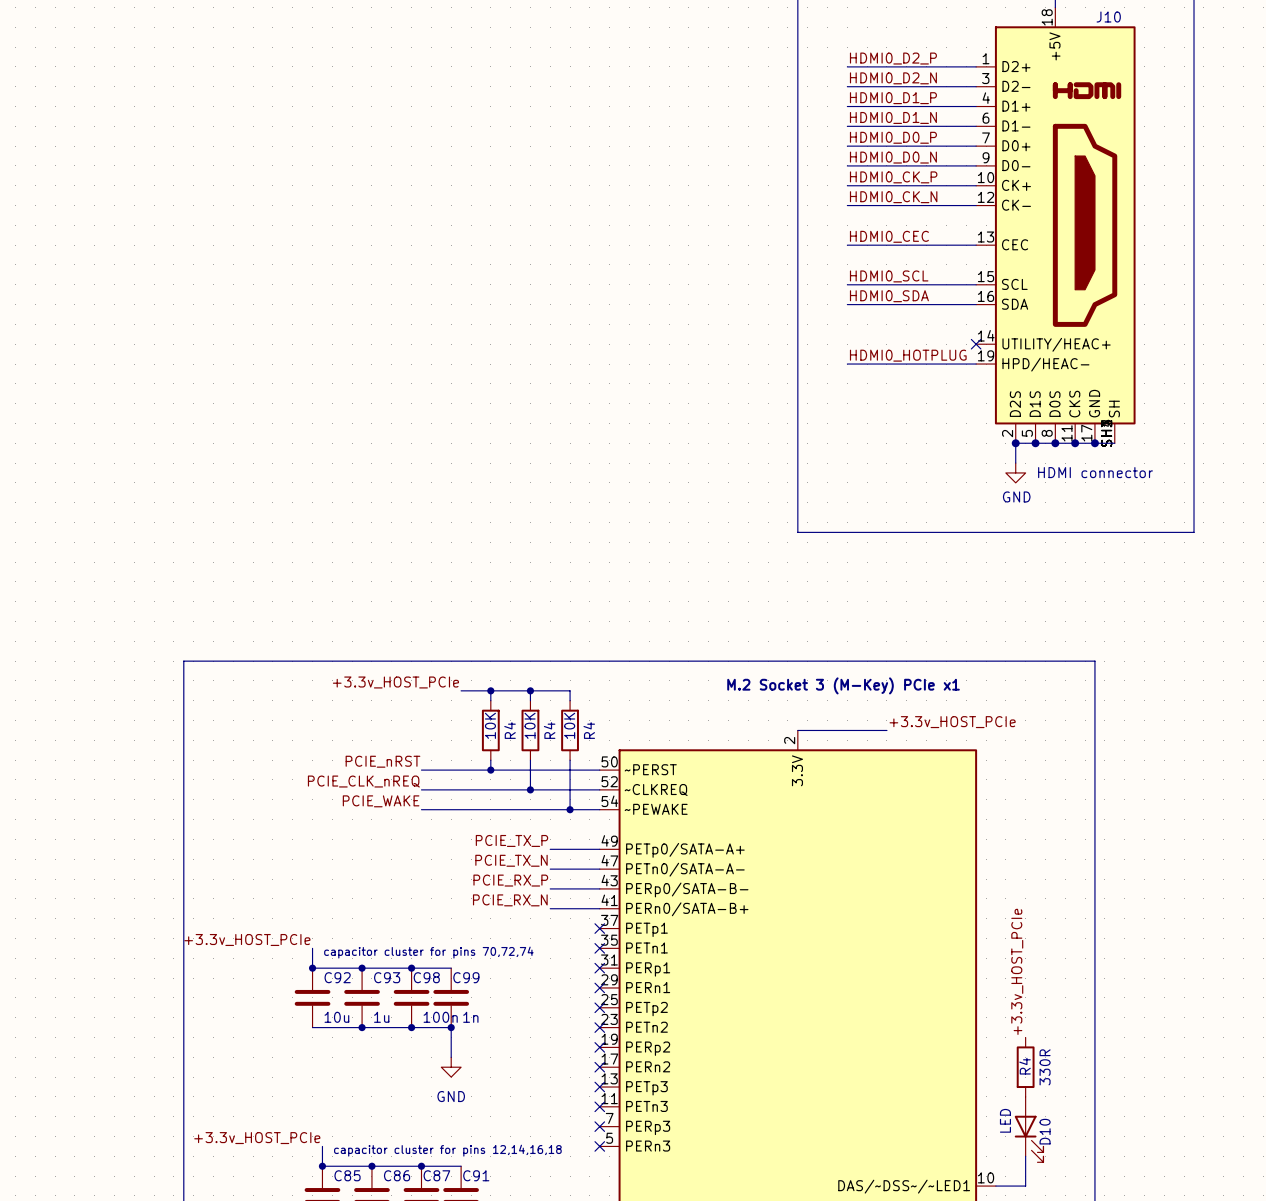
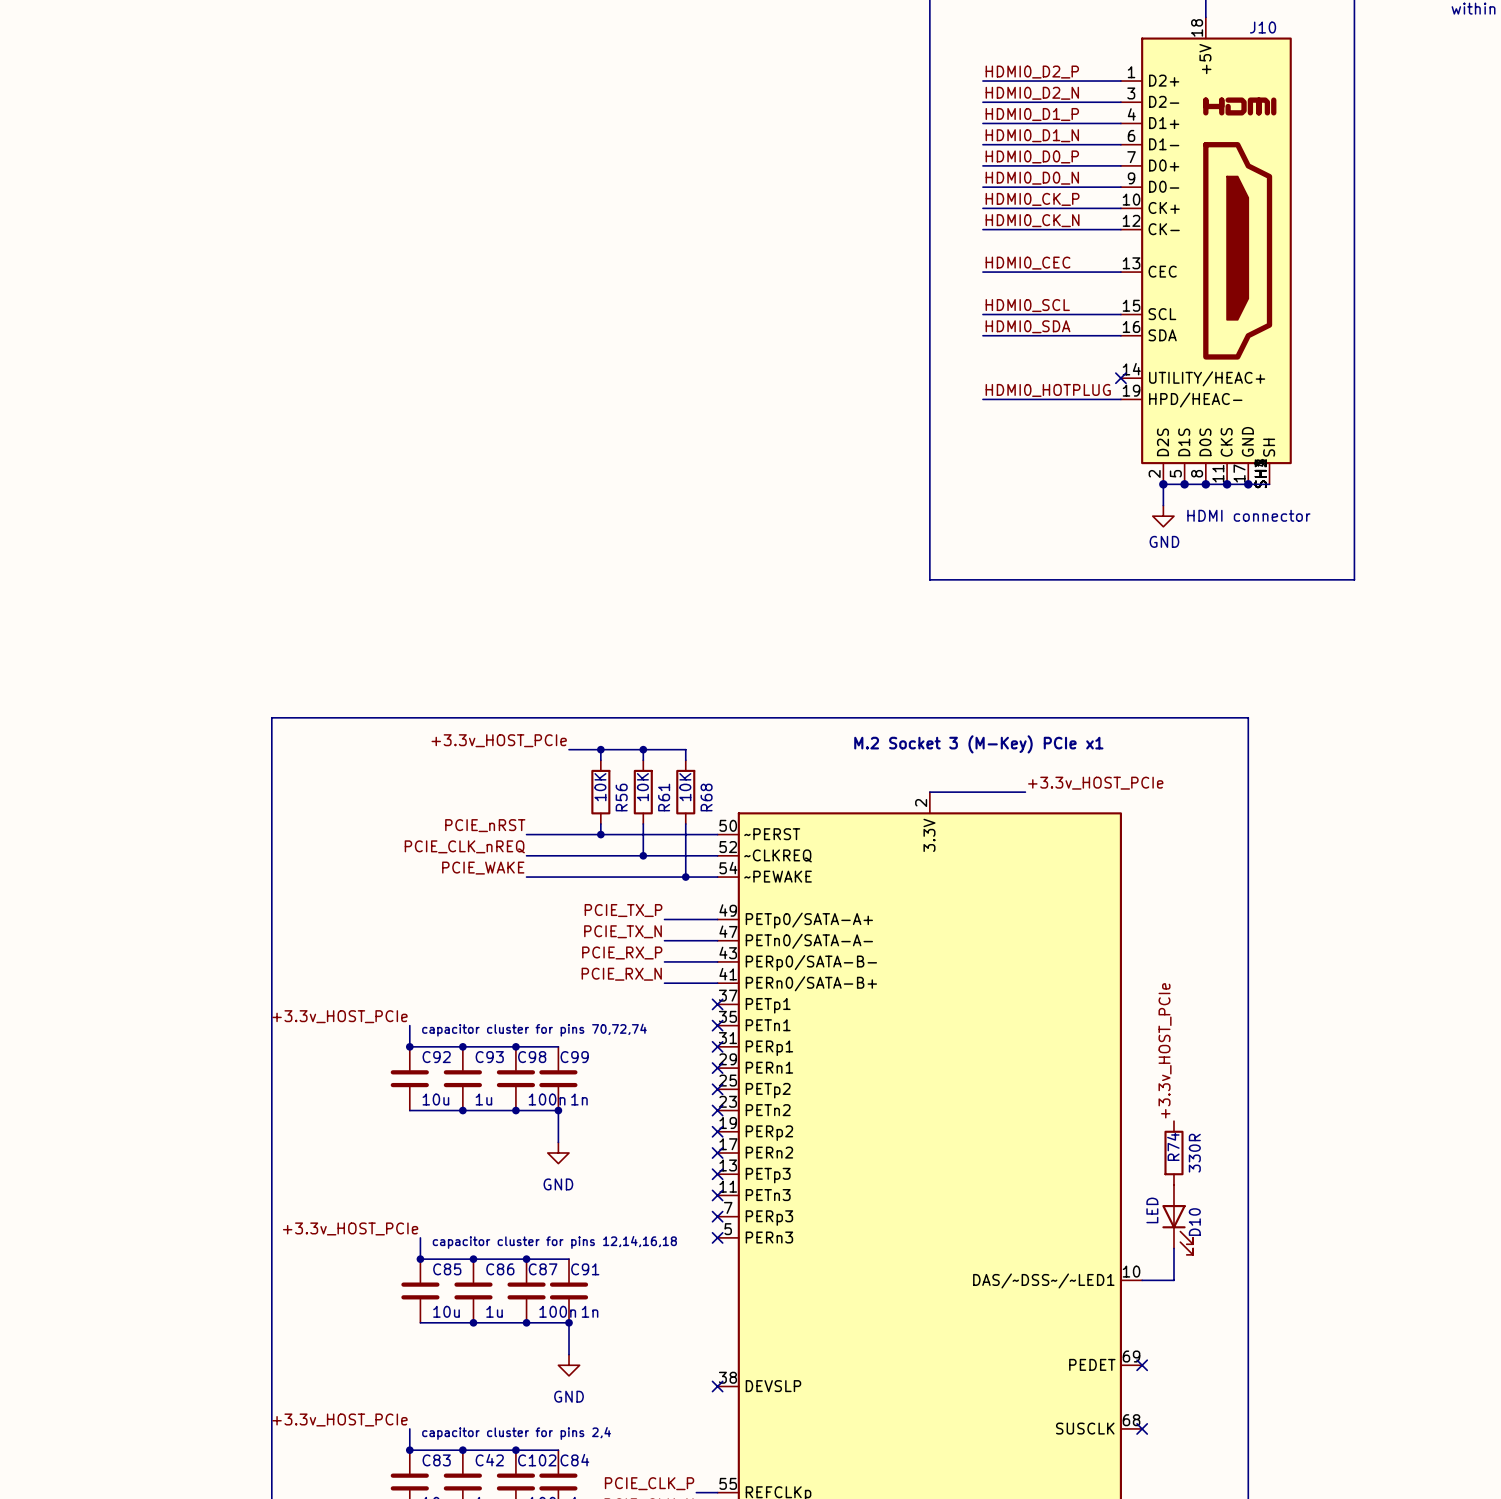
R4 name: R4 (510, 730) -> R56 (621, 797)
R4 name: R4 (549, 730) -> R61 (664, 797)
R4 name: R4 (589, 730) -> R68 (706, 797)
R4 name: R4 (1025, 1066) -> R74 (1173, 1146)

